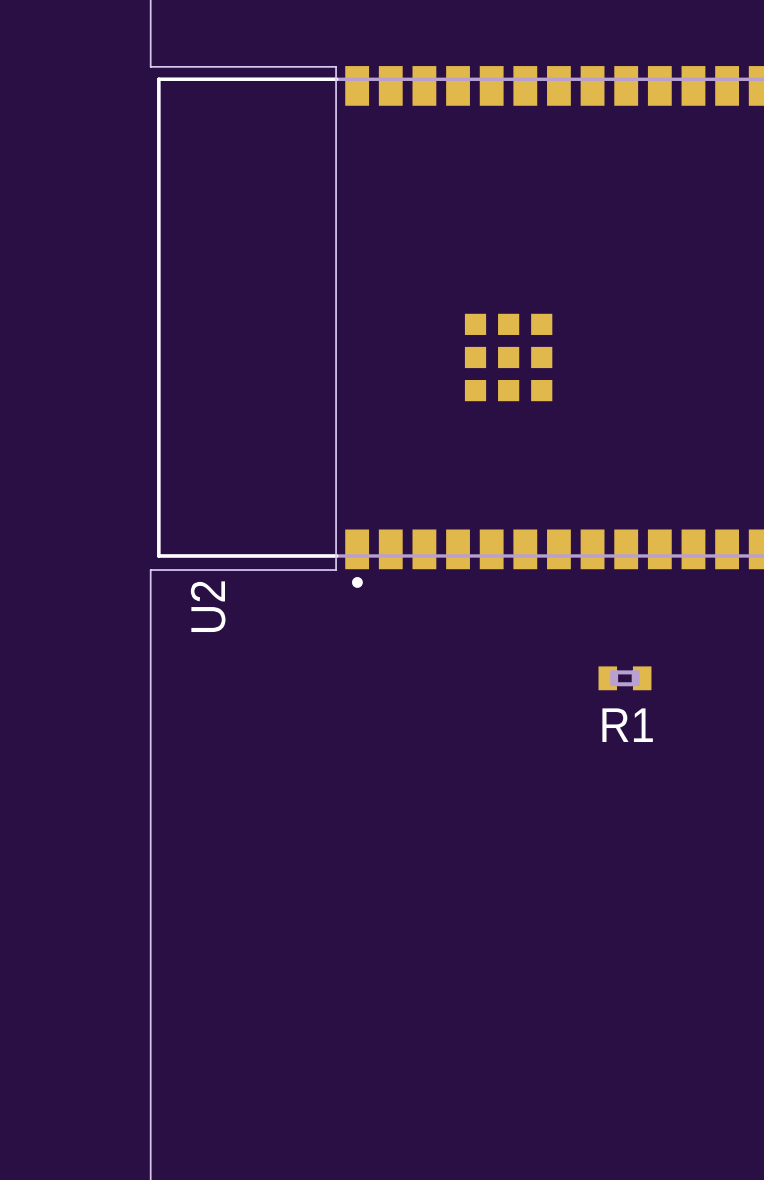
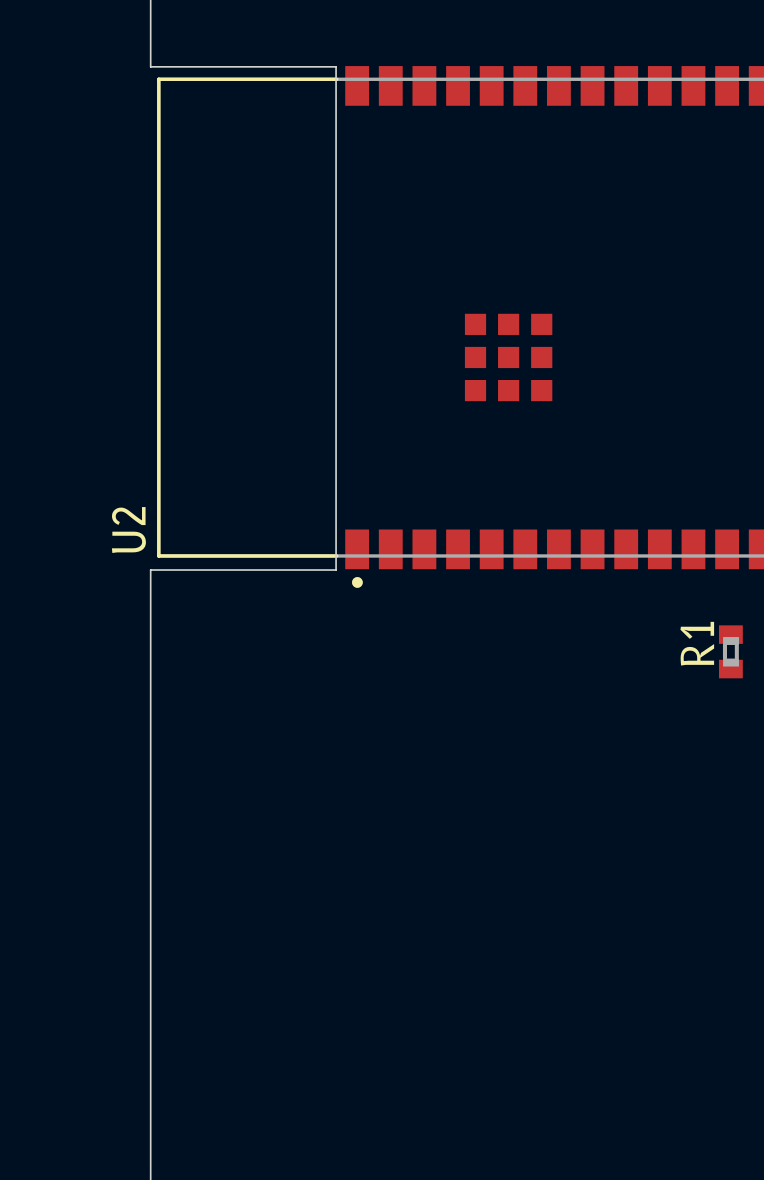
U2 name position: U2 (208, 606) -> U2 (128, 530)
R1 rotation: 0° (624, 678) -> 90° clockwise (730, 651)
R1 position: (624, 678) -> (730, 651)

